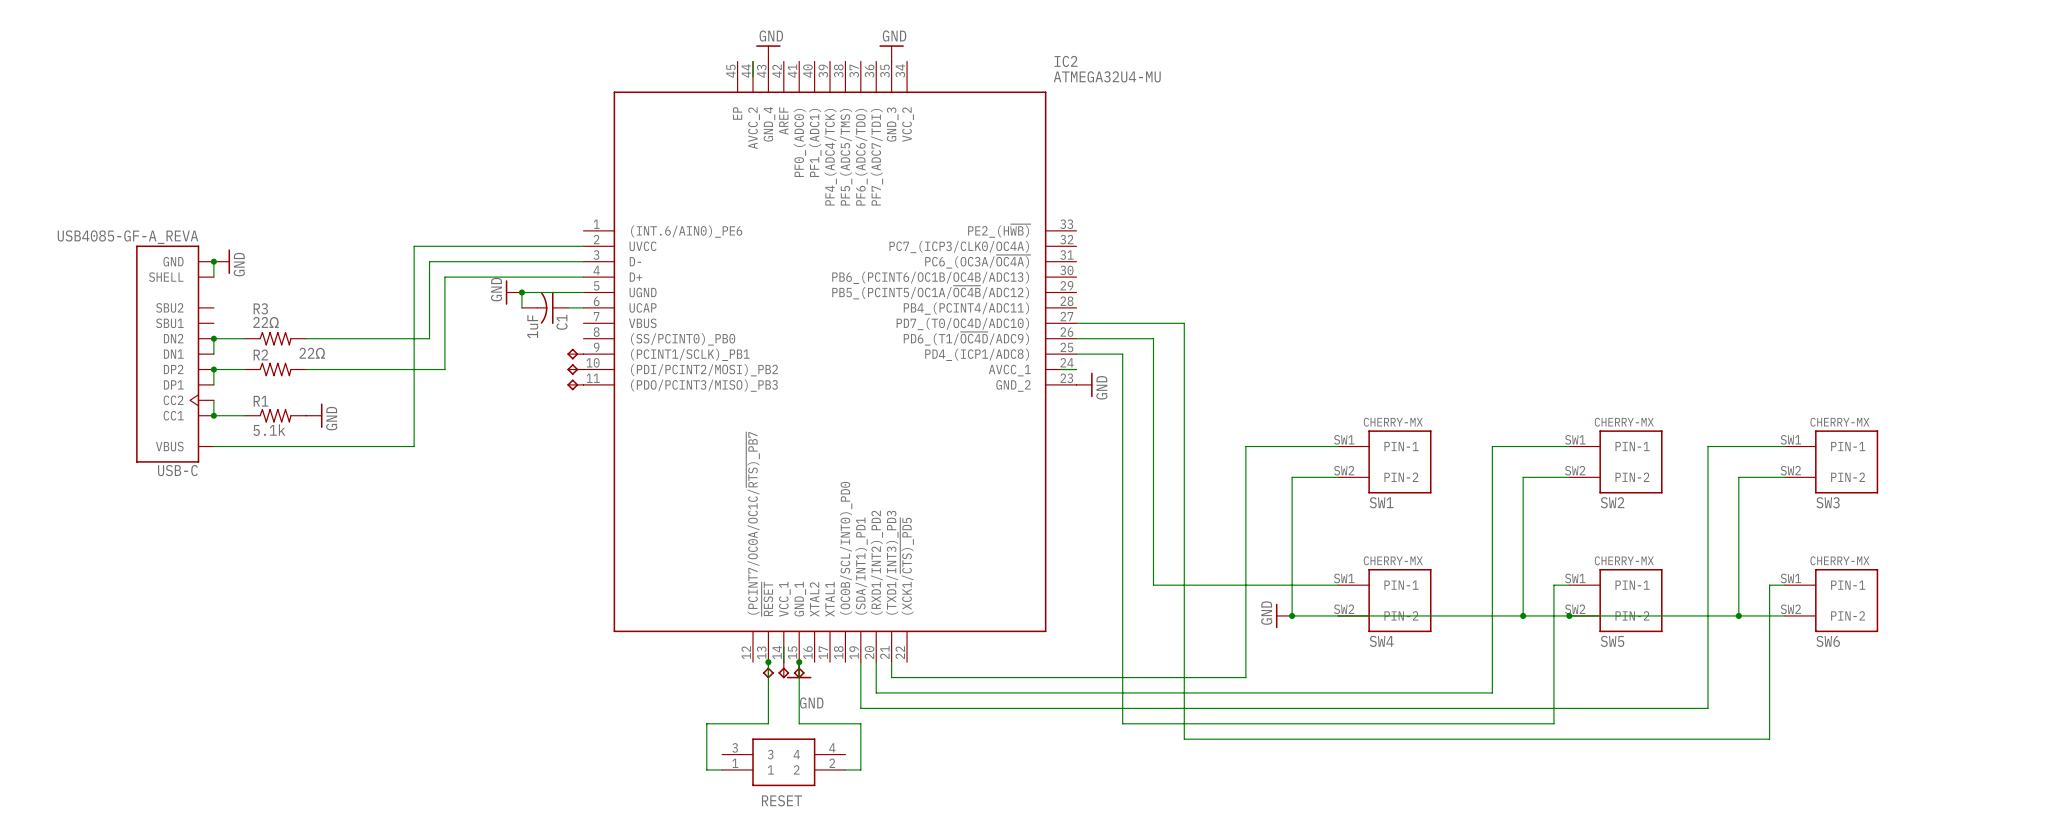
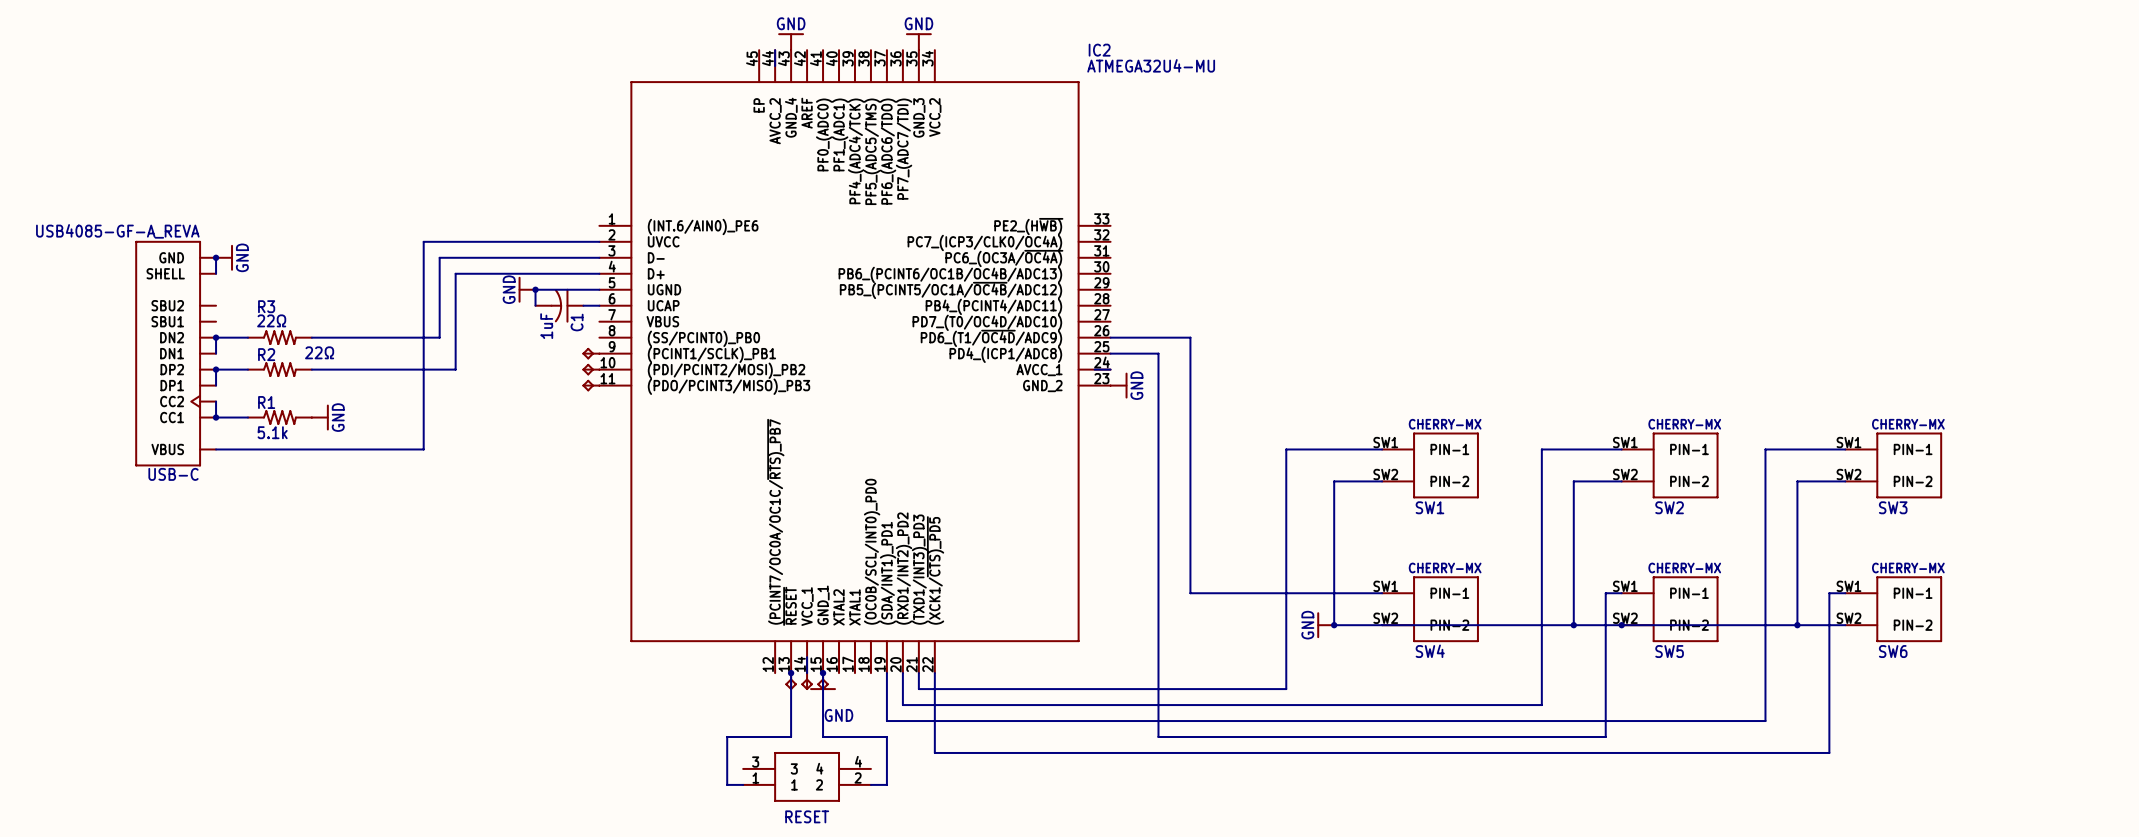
wire: (1076, 323) (1184, 323) (1184, 739) -> (934, 673) (934, 752) (1222, 752)

